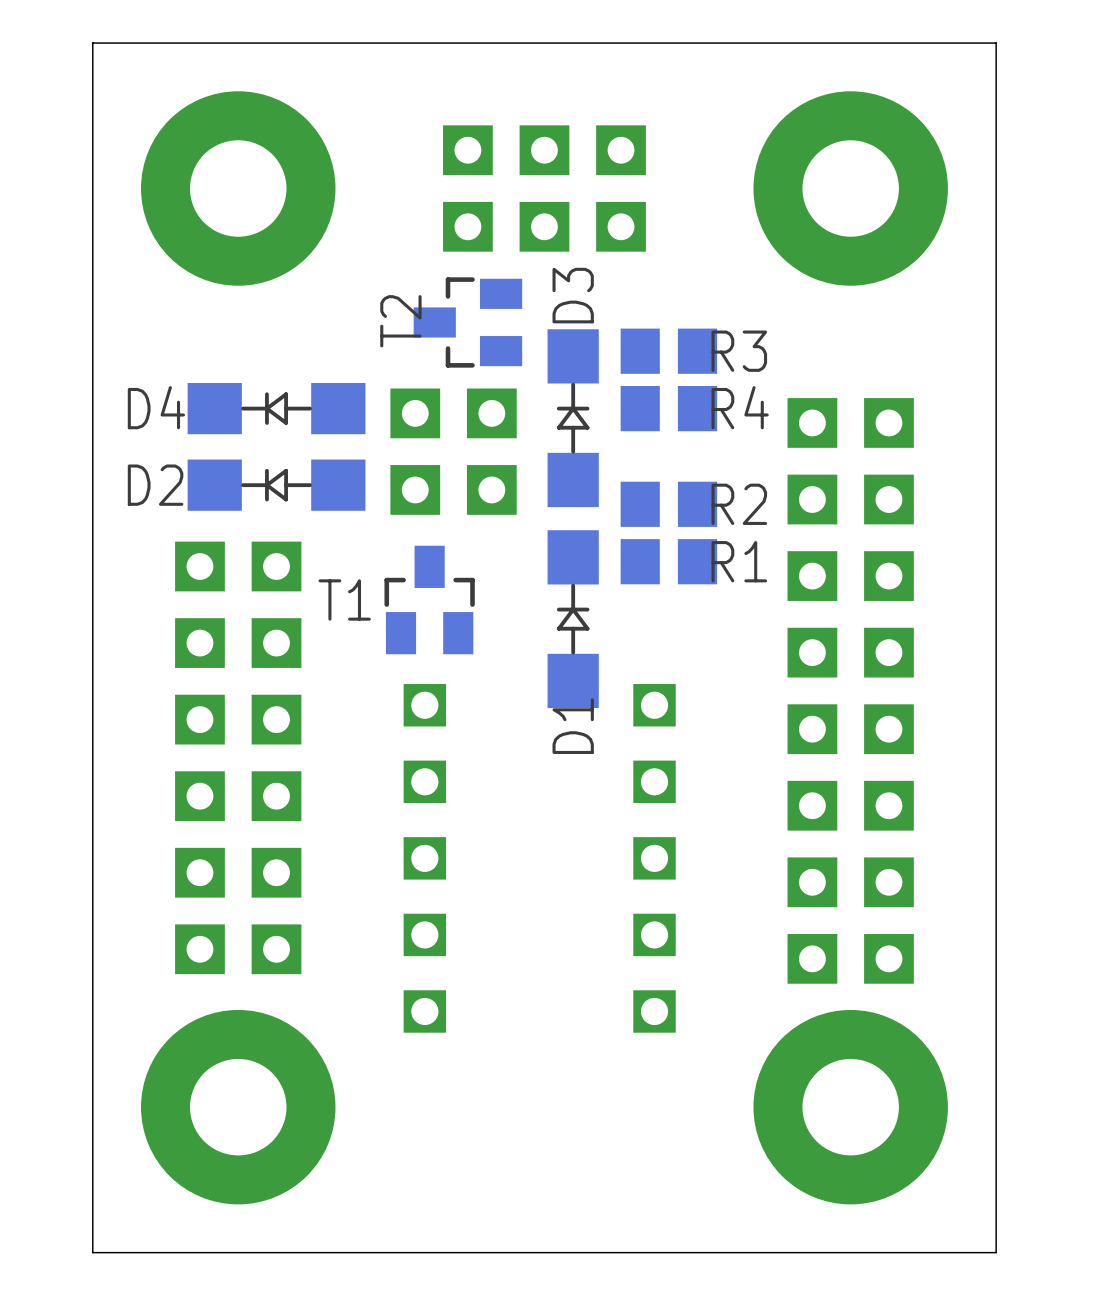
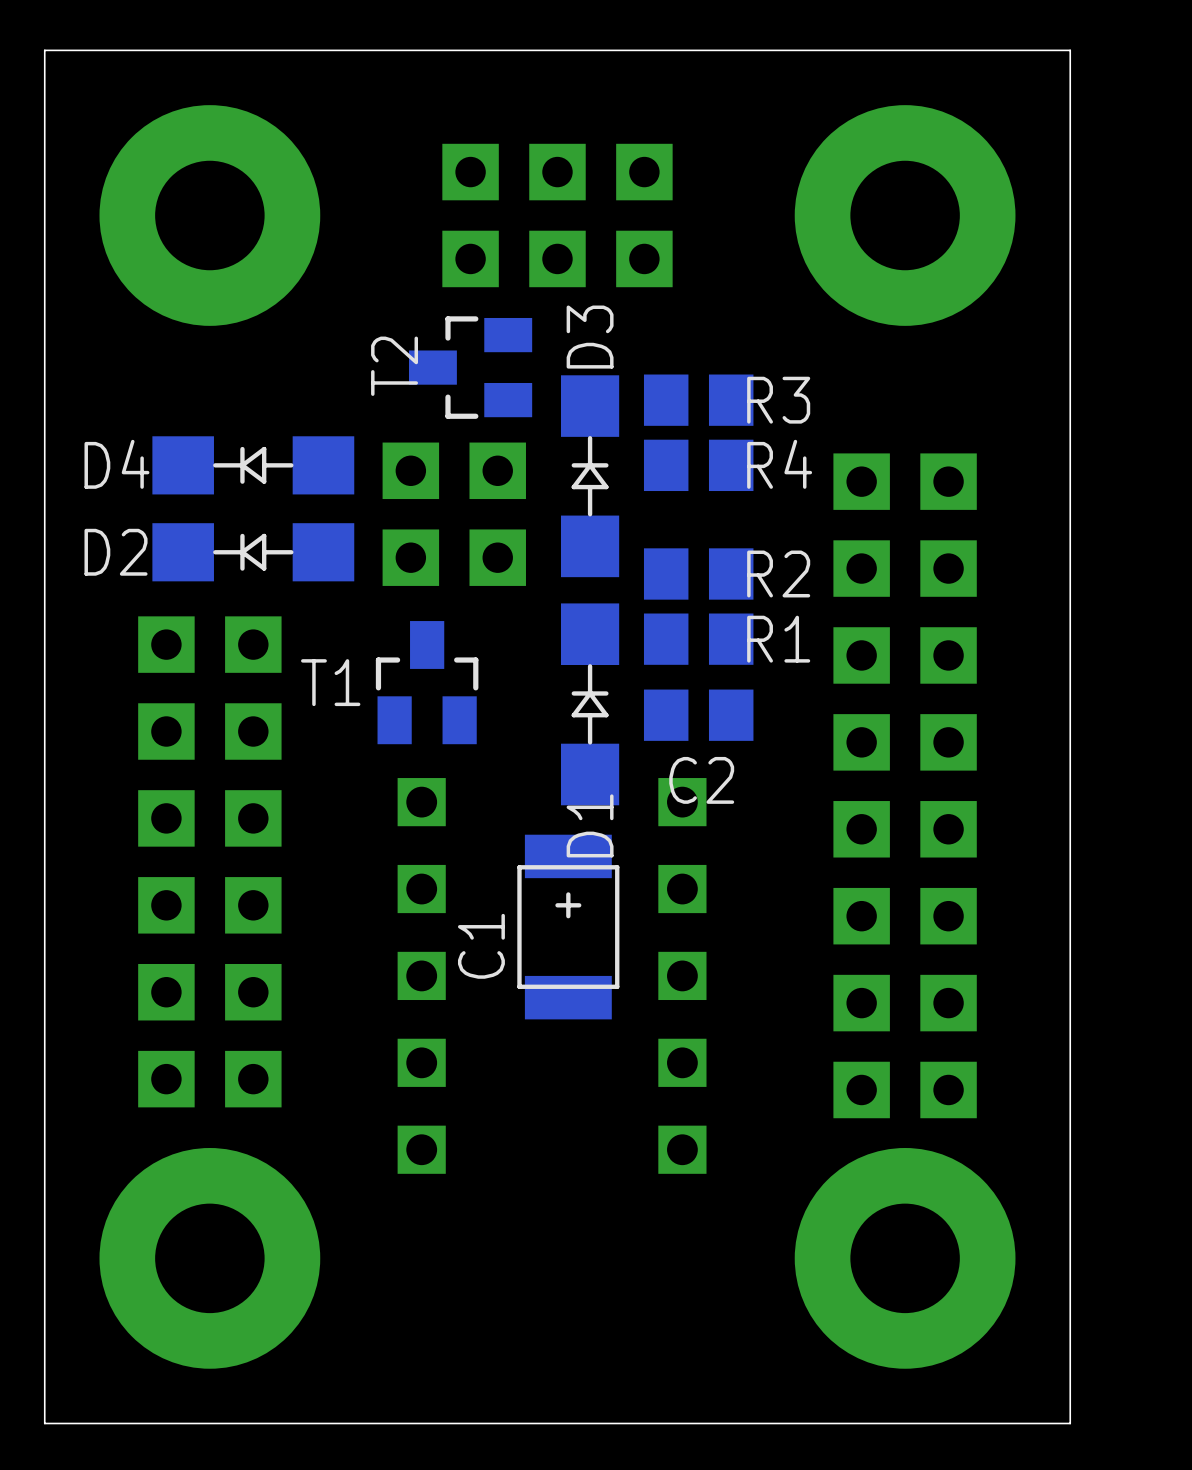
C2: none -> (698, 715)
C1: none -> (568, 927)

